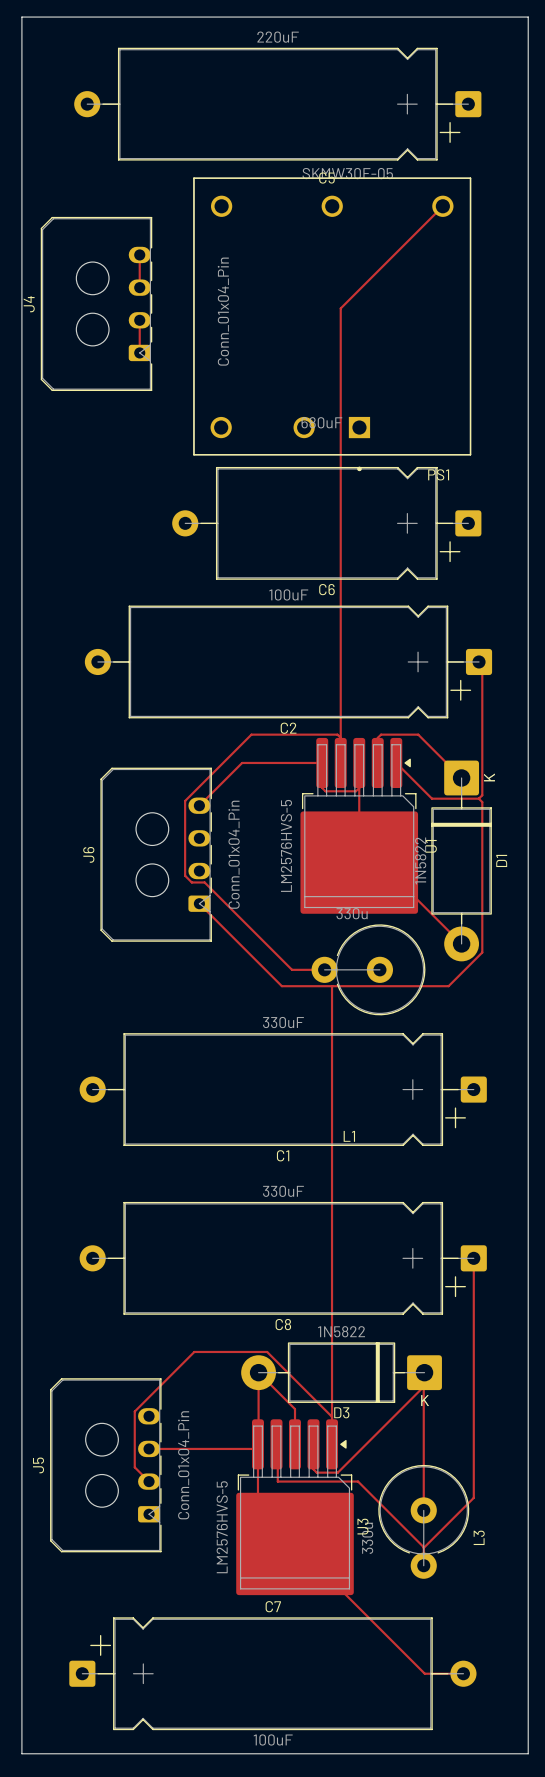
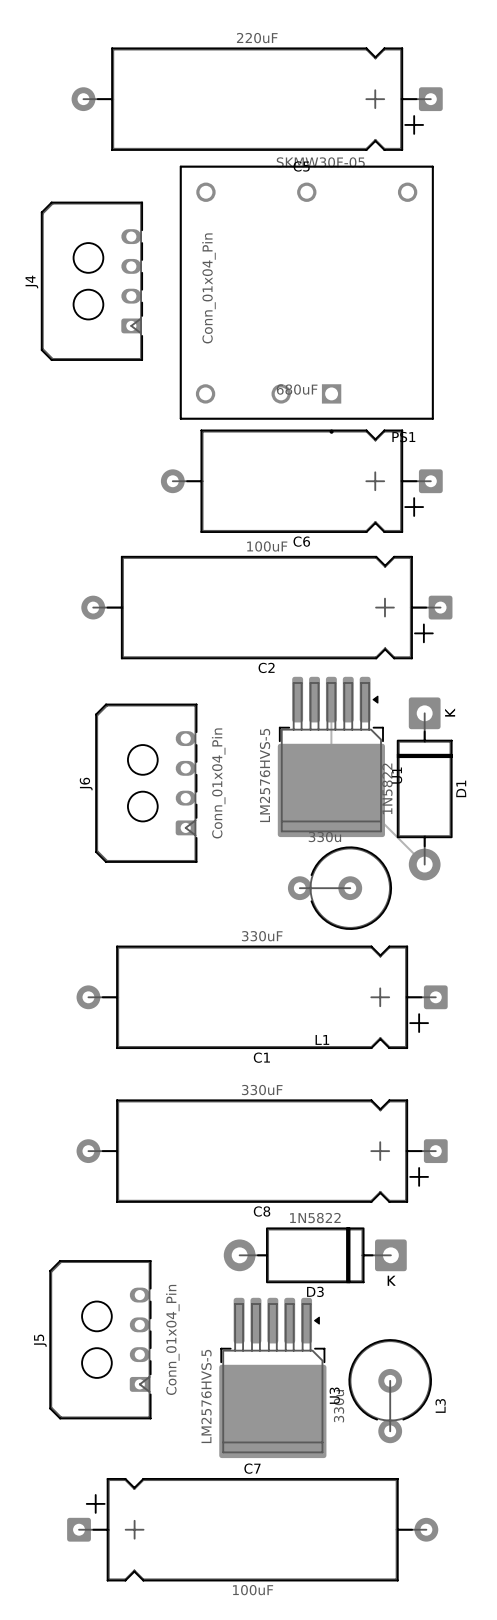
board edge: (21, 17) (528, 17) (528, 1753) (21, 1753) (21, 17) -> none
track: (442, 206) (340, 308) (340, 762) -> none
track: (139, 254) (139, 287) -> none
track: (139, 320) (139, 352) -> none
track: (479, 661) (482, 665) (482, 795) (478, 798) -> none
track: (340, 737) (337, 734) (251, 734) (185, 800) (185, 875) (191, 882) (204, 882) (292, 969) (324, 969) -> none
track: (396, 747) (396, 762) (431, 798) (478, 798) -> none
track: (377, 762) (377, 737) (381, 734) (418, 734) (461, 777) (448, 791) -> none
track: (359, 788) (355, 791) (325, 791) (322, 788) (322, 762) (242, 762) (199, 805) -> none
track: (478, 798) (482, 802) (482, 952) (448, 986) (281, 986) (199, 903) -> none
track: (332, 986) (332, 1444) -> none
track: (473, 1258) (473, 1497) (423, 1547) -> none
track: (332, 1416) (267, 1351) (194, 1351) (134, 1411) (134, 1467) (149, 1481) -> none
track: (257, 1444) (253, 1448) (149, 1448) -> none
track: (276, 1444) (277, 1481) (358, 1481) (423, 1547) (423, 1565) -> none
track: (295, 1444) (295, 1409) (258, 1372) (257, 1506) (424, 1673) (463, 1673) -> none
track: (313, 1444) (313, 1469) (316, 1472) (337, 1472) (424, 1385) (424, 1372) (423, 1373) (423, 1510) -> none

